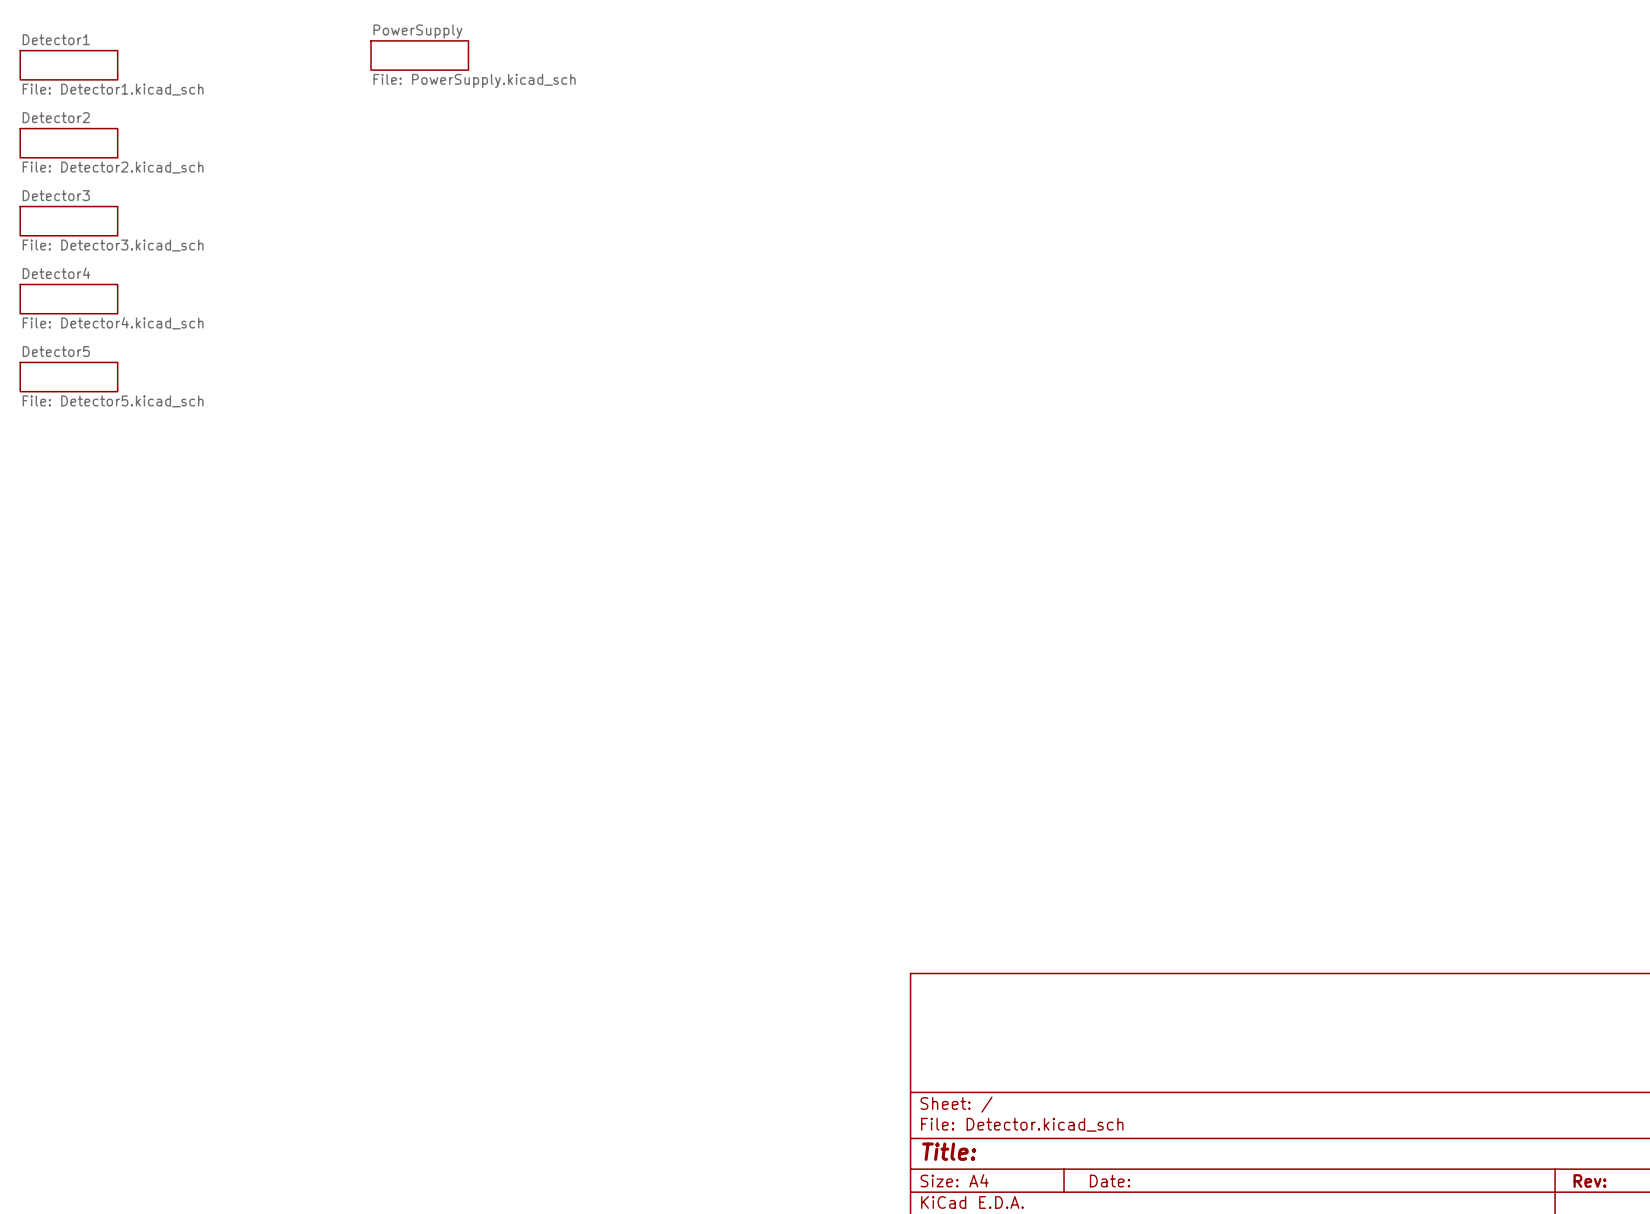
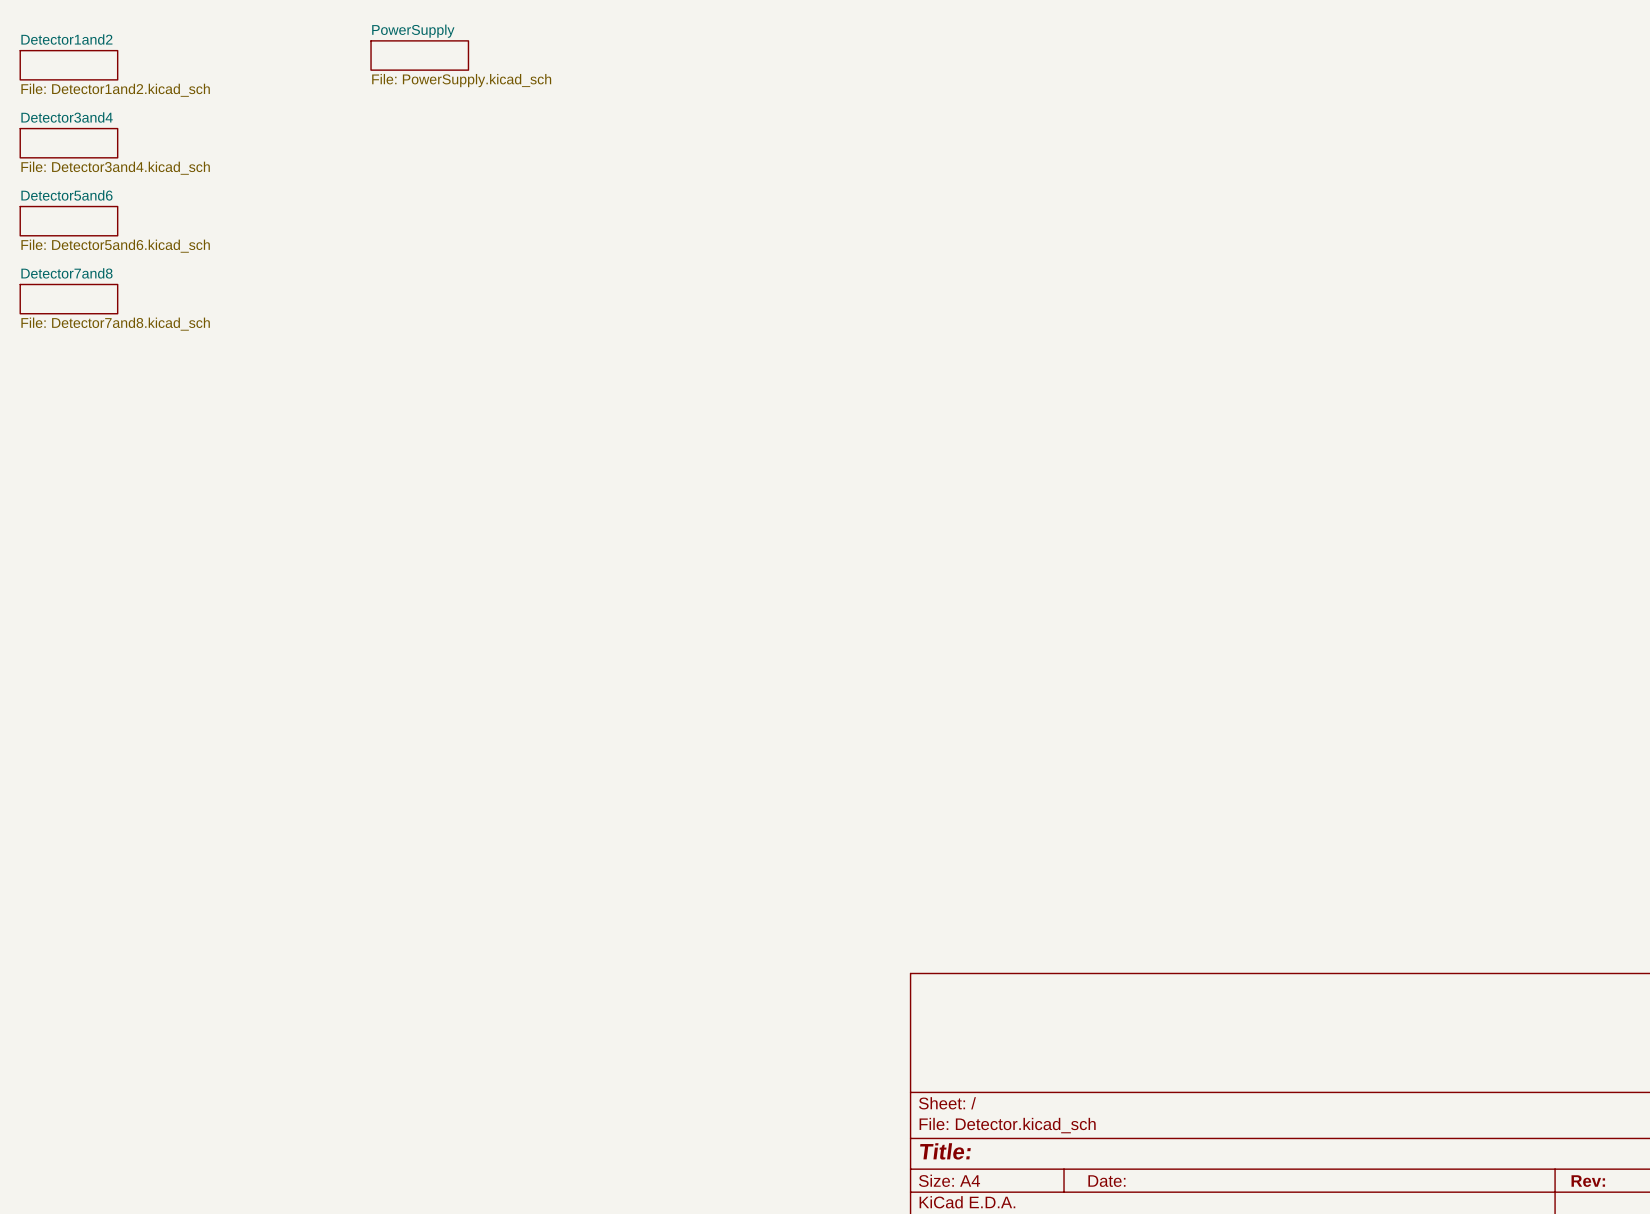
sheet Detector1 name: Detector1 (56, 39) -> Detector1and2 (66, 39)
sheet Detector1 value: File: Detector1.kicad_sch (113, 89) -> File: Detector1and2.kicad_sch (115, 90)
sheet Detector2 name: Detector2 (56, 117) -> Detector3and4 (67, 117)
sheet Detector2 value: File: Detector2.kicad_sch (113, 167) -> File: Detector3and4.kicad_sch (115, 168)
sheet Detector3 name: Detector3 (56, 195) -> Detector5and6 (66, 195)
sheet Detector3 value: File: Detector3.kicad_sch (113, 245) -> File: Detector5and6.kicad_sch (115, 246)
sheet Detector4 name: Detector4 (56, 273) -> Detector7and8 (66, 273)
sheet Detector4 value: File: Detector4.kicad_sch (113, 323) -> File: Detector7and8.kicad_sch (115, 324)
sheet Detector5: File: Detector5.kicad_sch (68, 377) -> none

